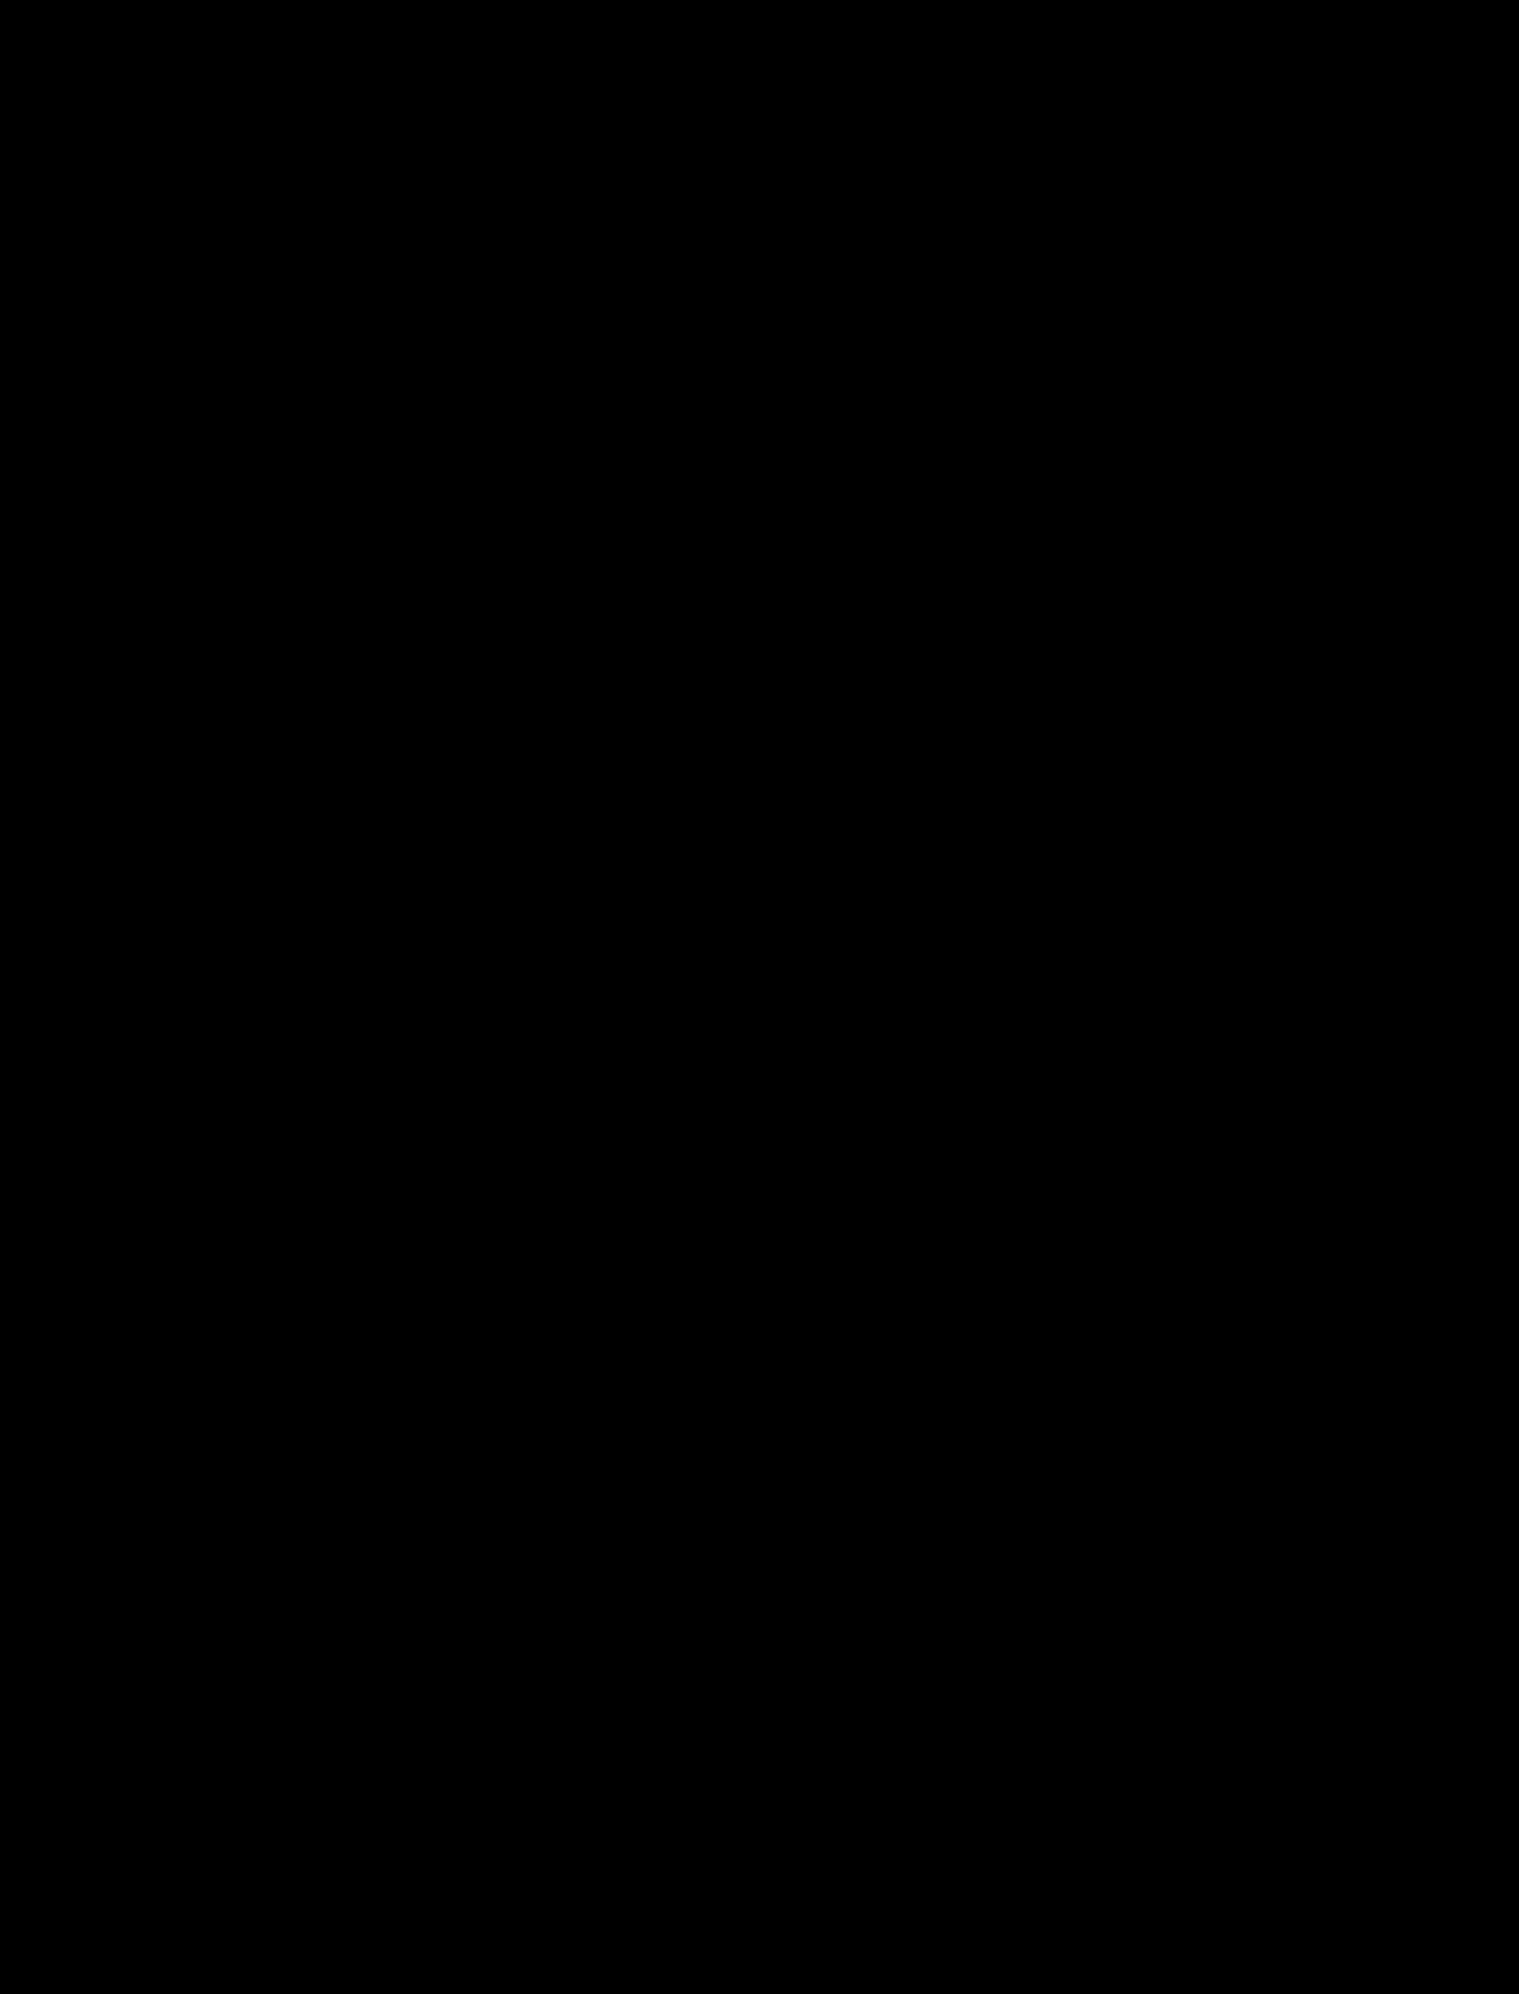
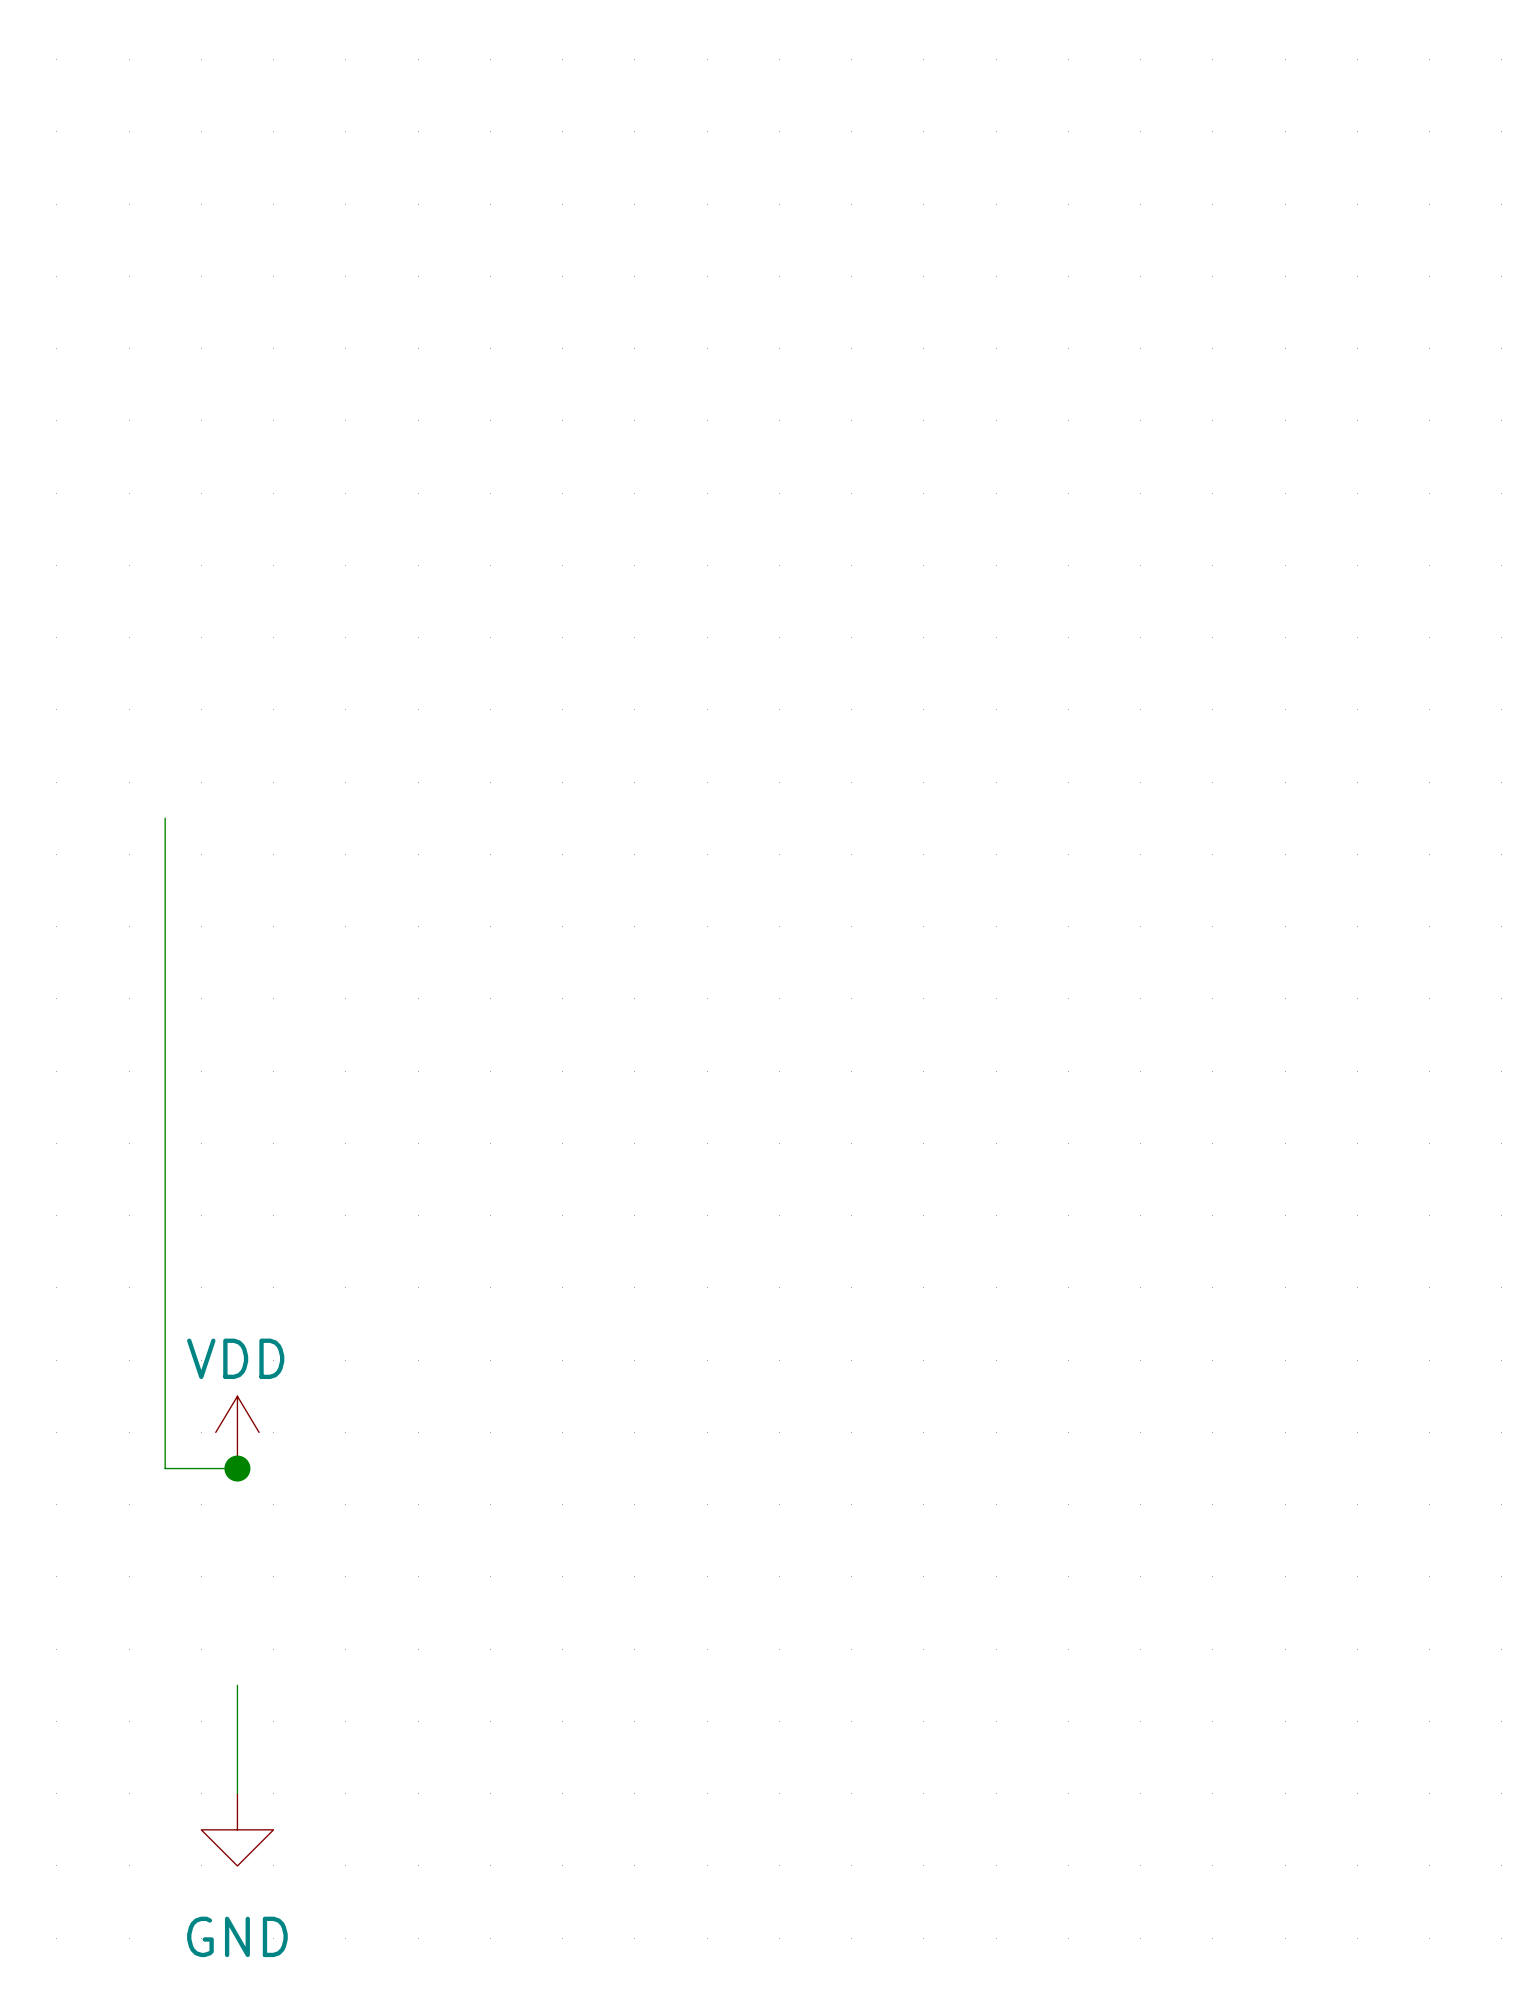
wire: none -> (165, 818) (165, 1468) (237, 1468)
power symbol: none -> VDD (237, 1432)
junction: none -> (237, 1468)
wire: none -> (237, 1685) (237, 1793)
power symbol: none -> GND (237, 1829)

